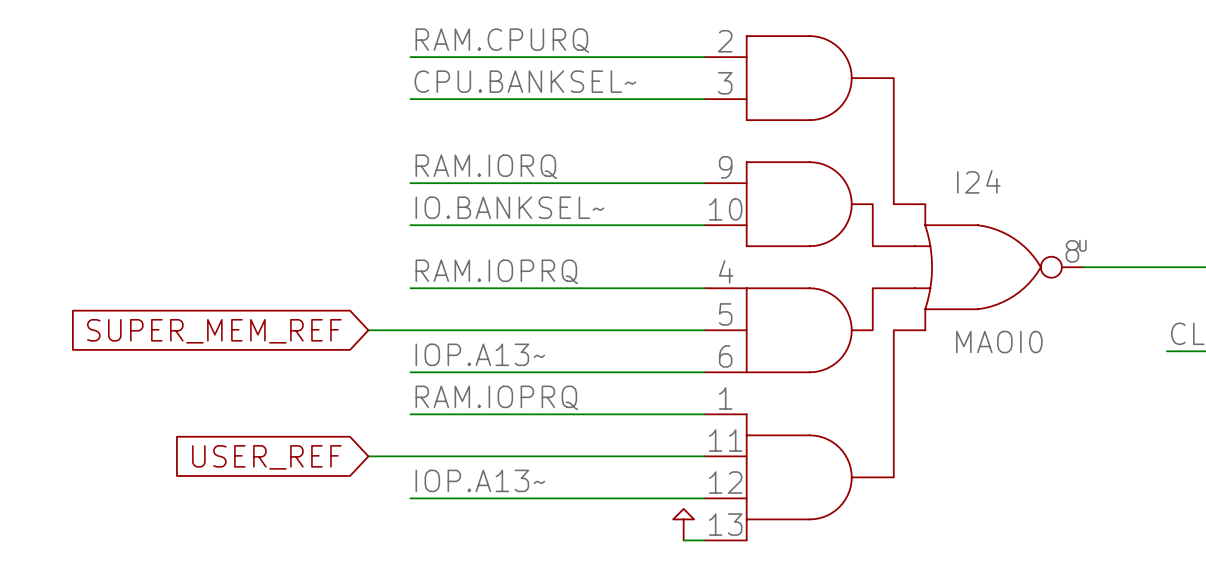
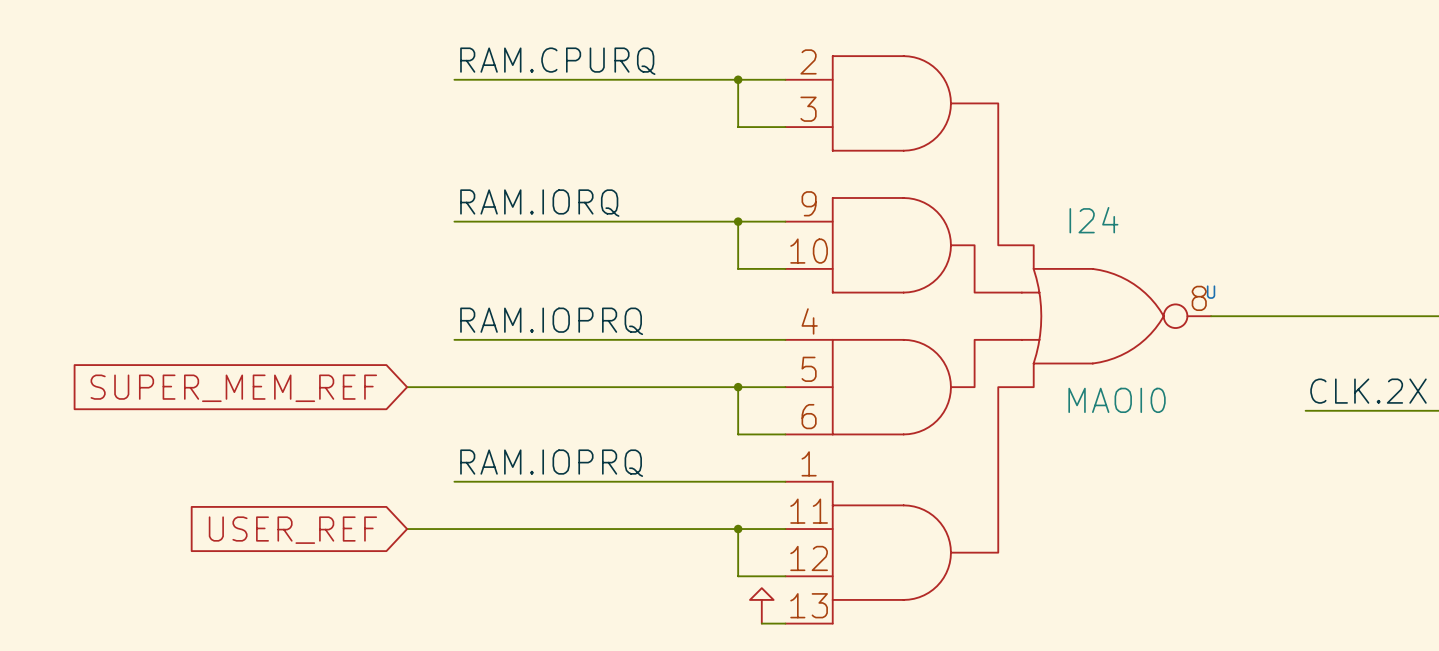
junction: none -> (738, 79)
label: CPU.BANKSEL~ (525, 81) -> none
wire: (410, 99) (662, 99) -> (738, 79) (738, 127)
junction: none -> (738, 221)
label: IO.BANKSEL~ (509, 207) -> none
wire: (410, 225) (662, 225) -> (738, 221) (738, 268)
junction: none -> (738, 387)
label: IOP.A13~ (480, 354) -> none
wire: (410, 372) (662, 372) -> (738, 387) (738, 434)
junction: none -> (738, 529)
label: IOP.A13~ (480, 480) -> none
wire: (410, 498) (662, 498) -> (738, 529) (738, 576)

